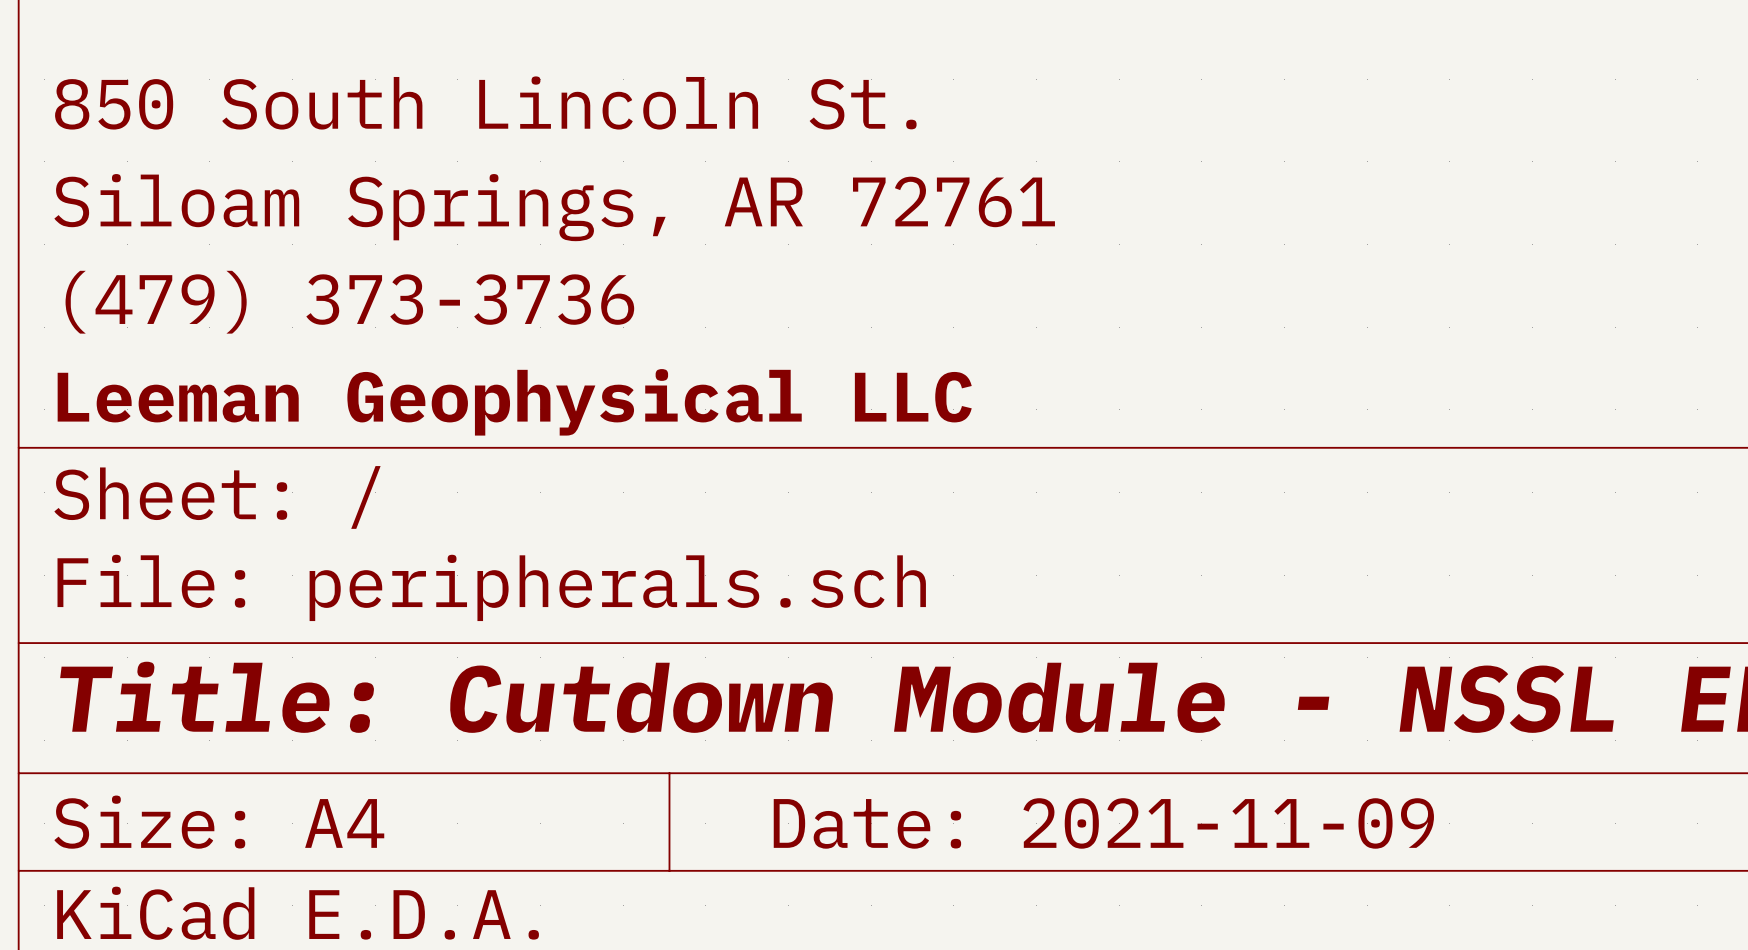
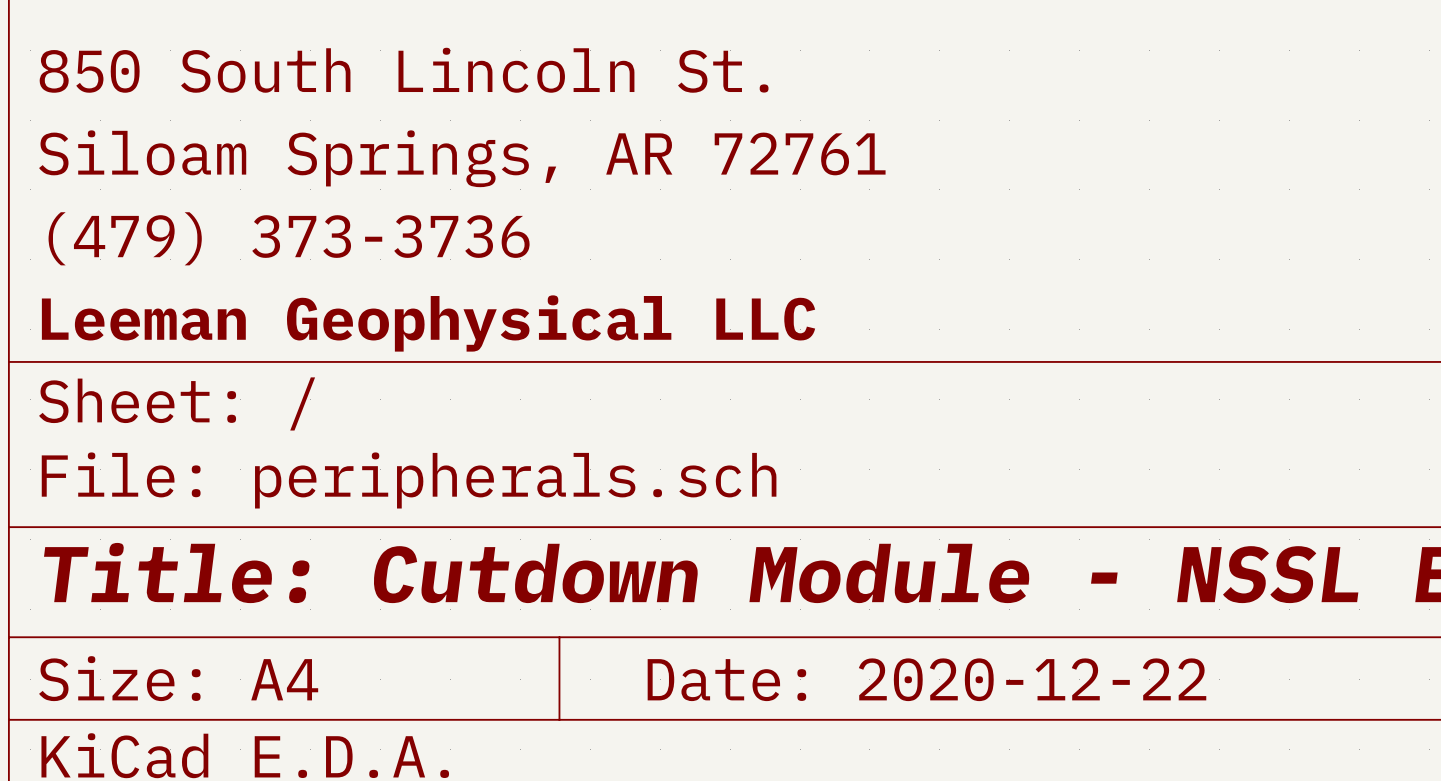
title block: Date: 2021-11-09 (1103, 823) -> Date: 2020-12-22 (926, 679)

